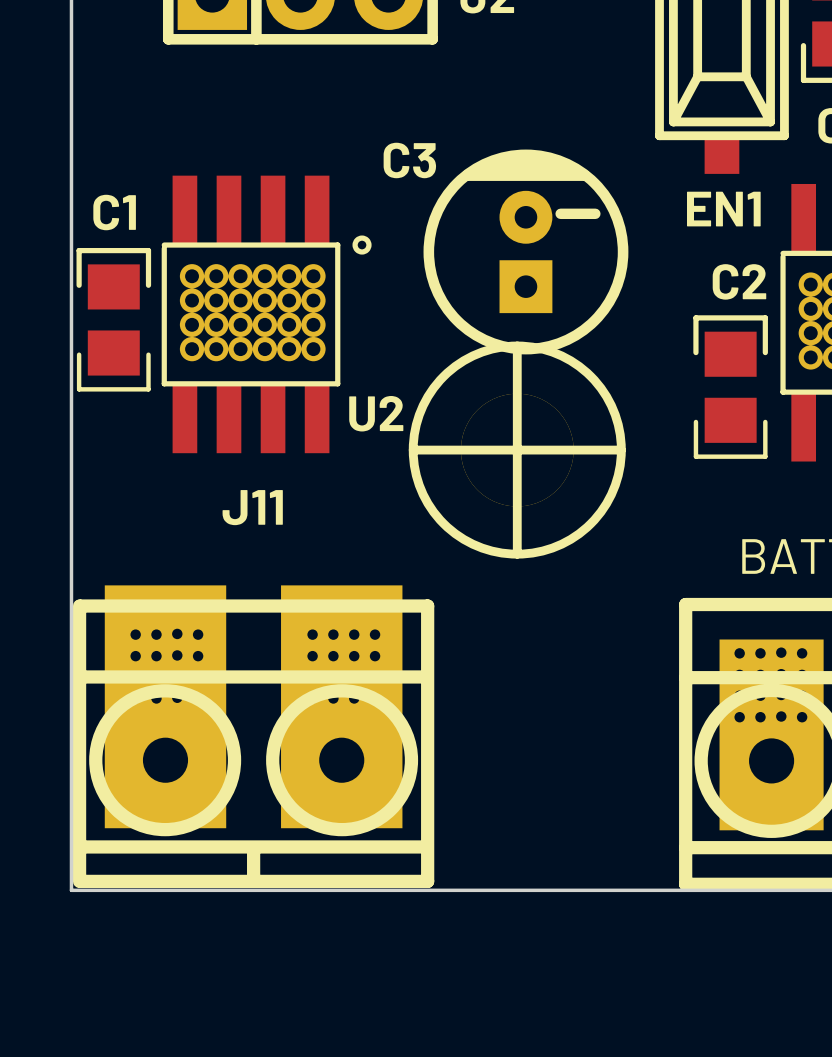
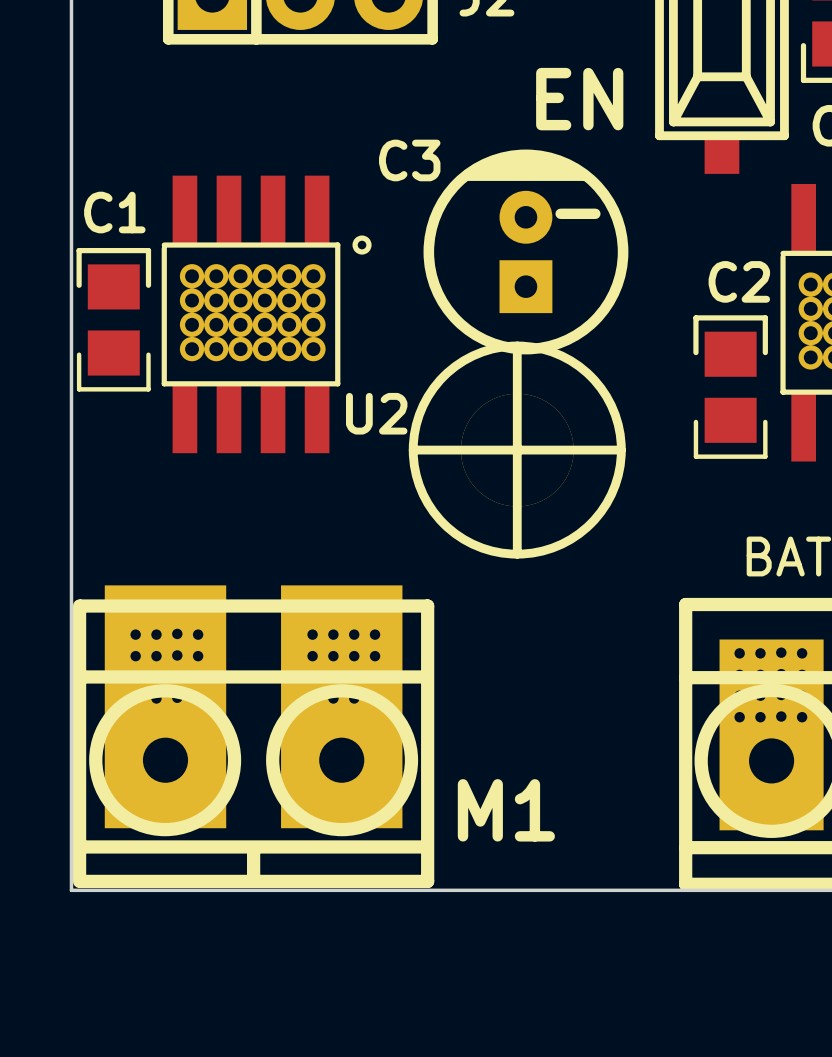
EN1 name: EN1 (723, 209) -> EN (579, 99)
J11 name: J11 (252, 507) -> none
J11 value: none -> M1 (506, 810)

